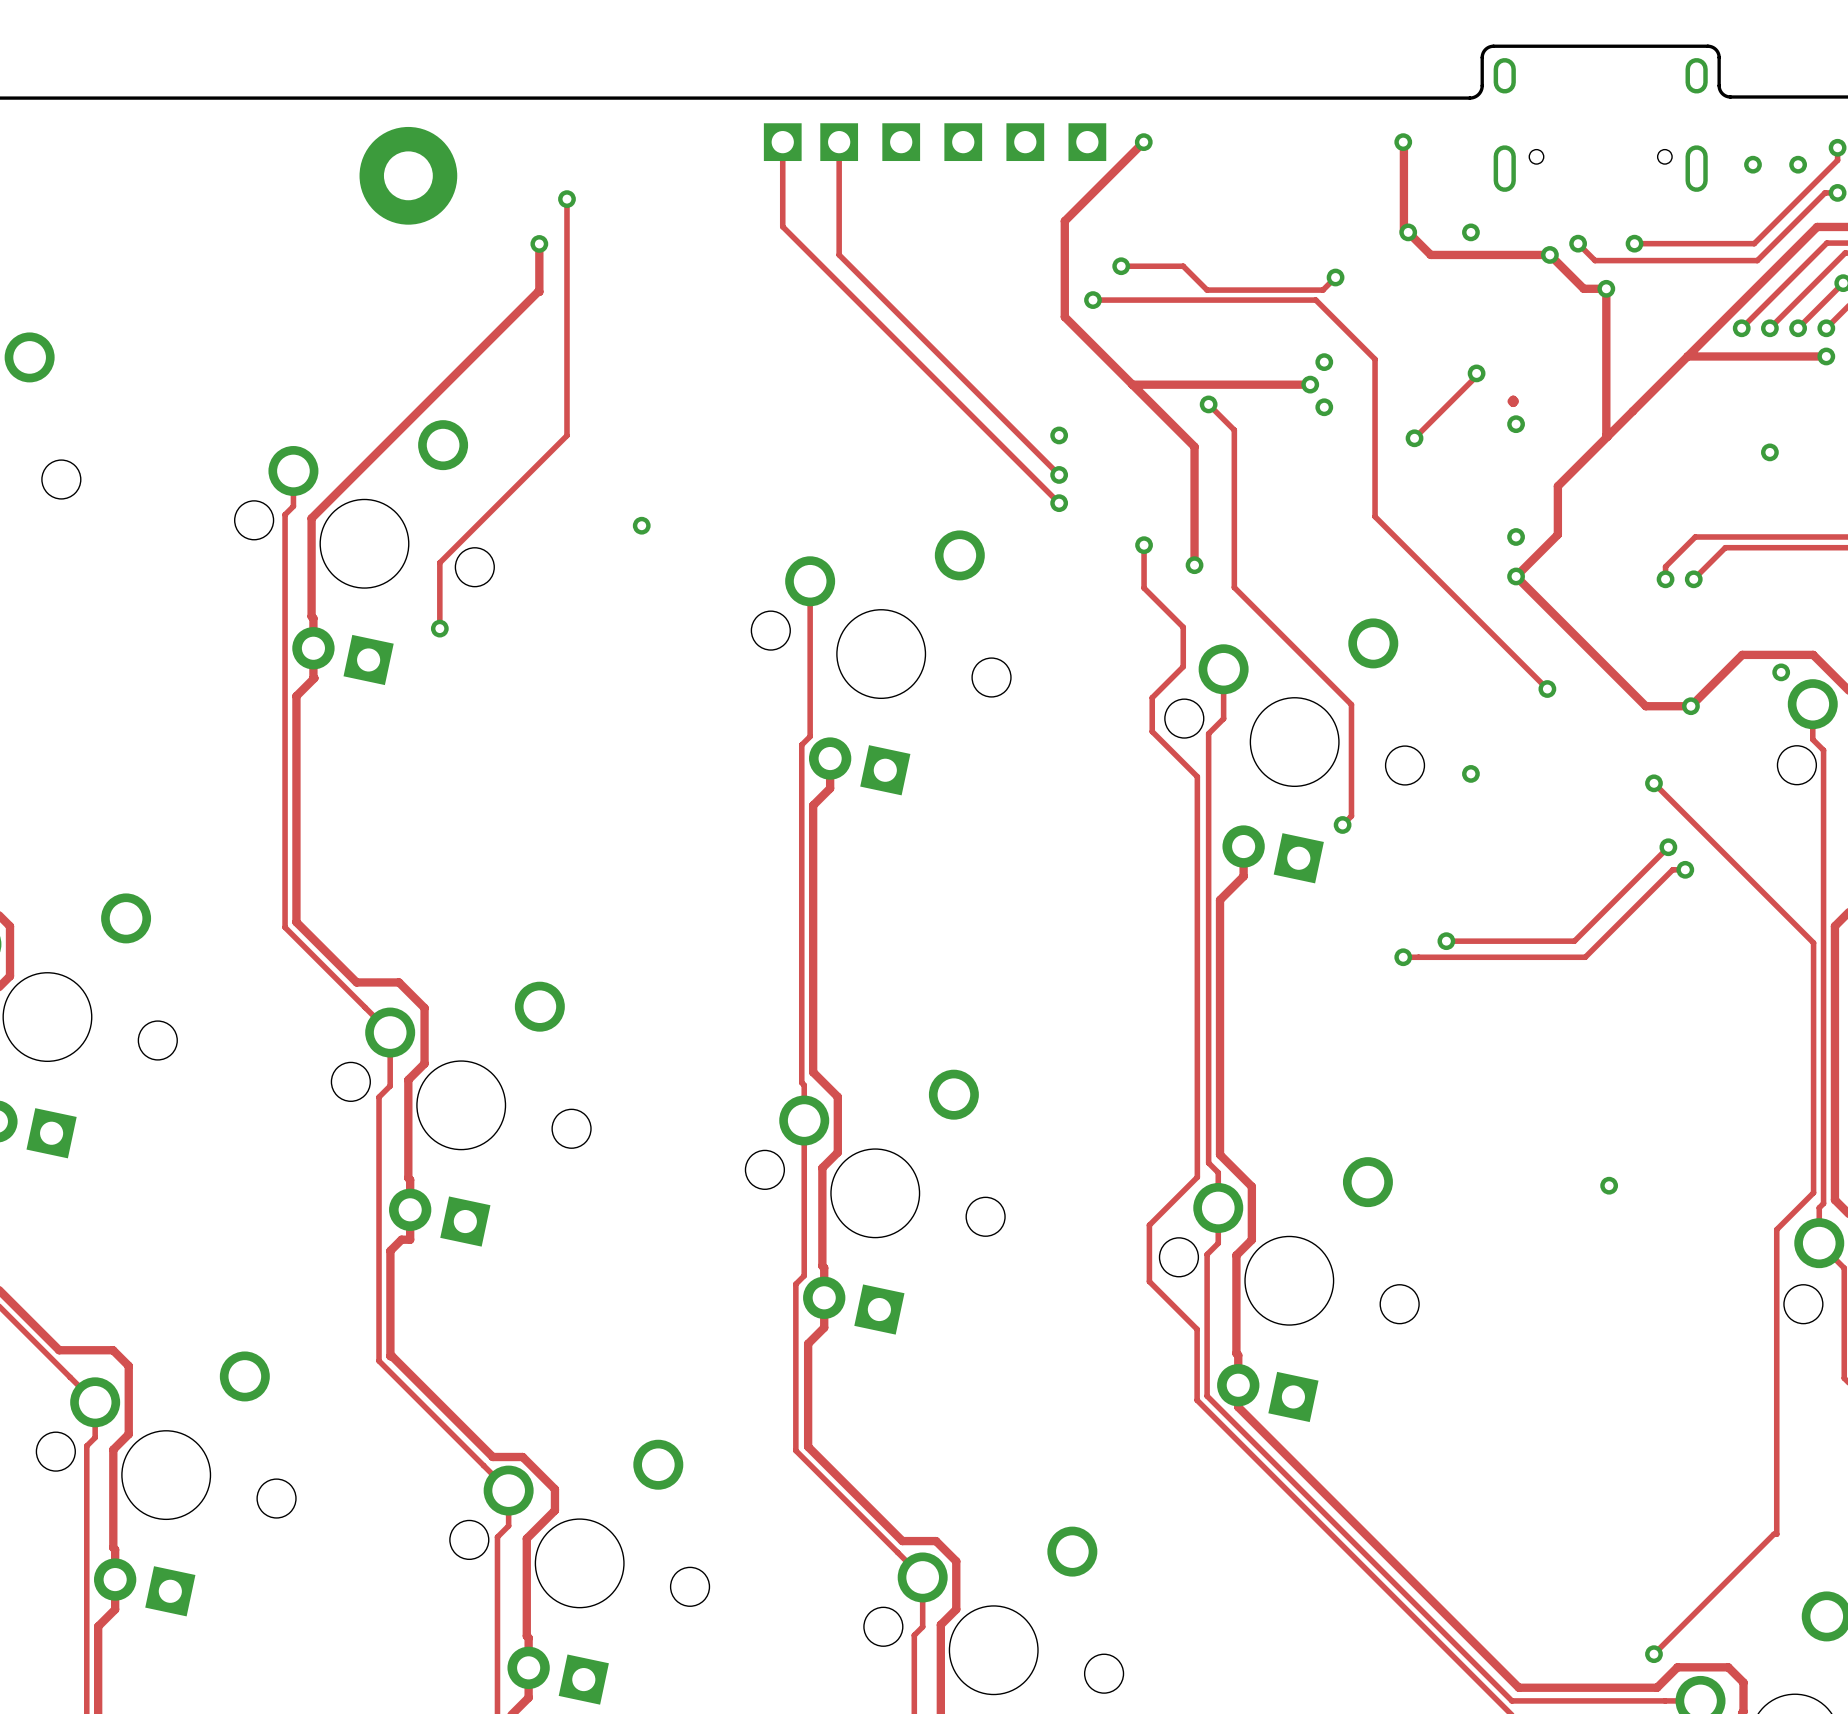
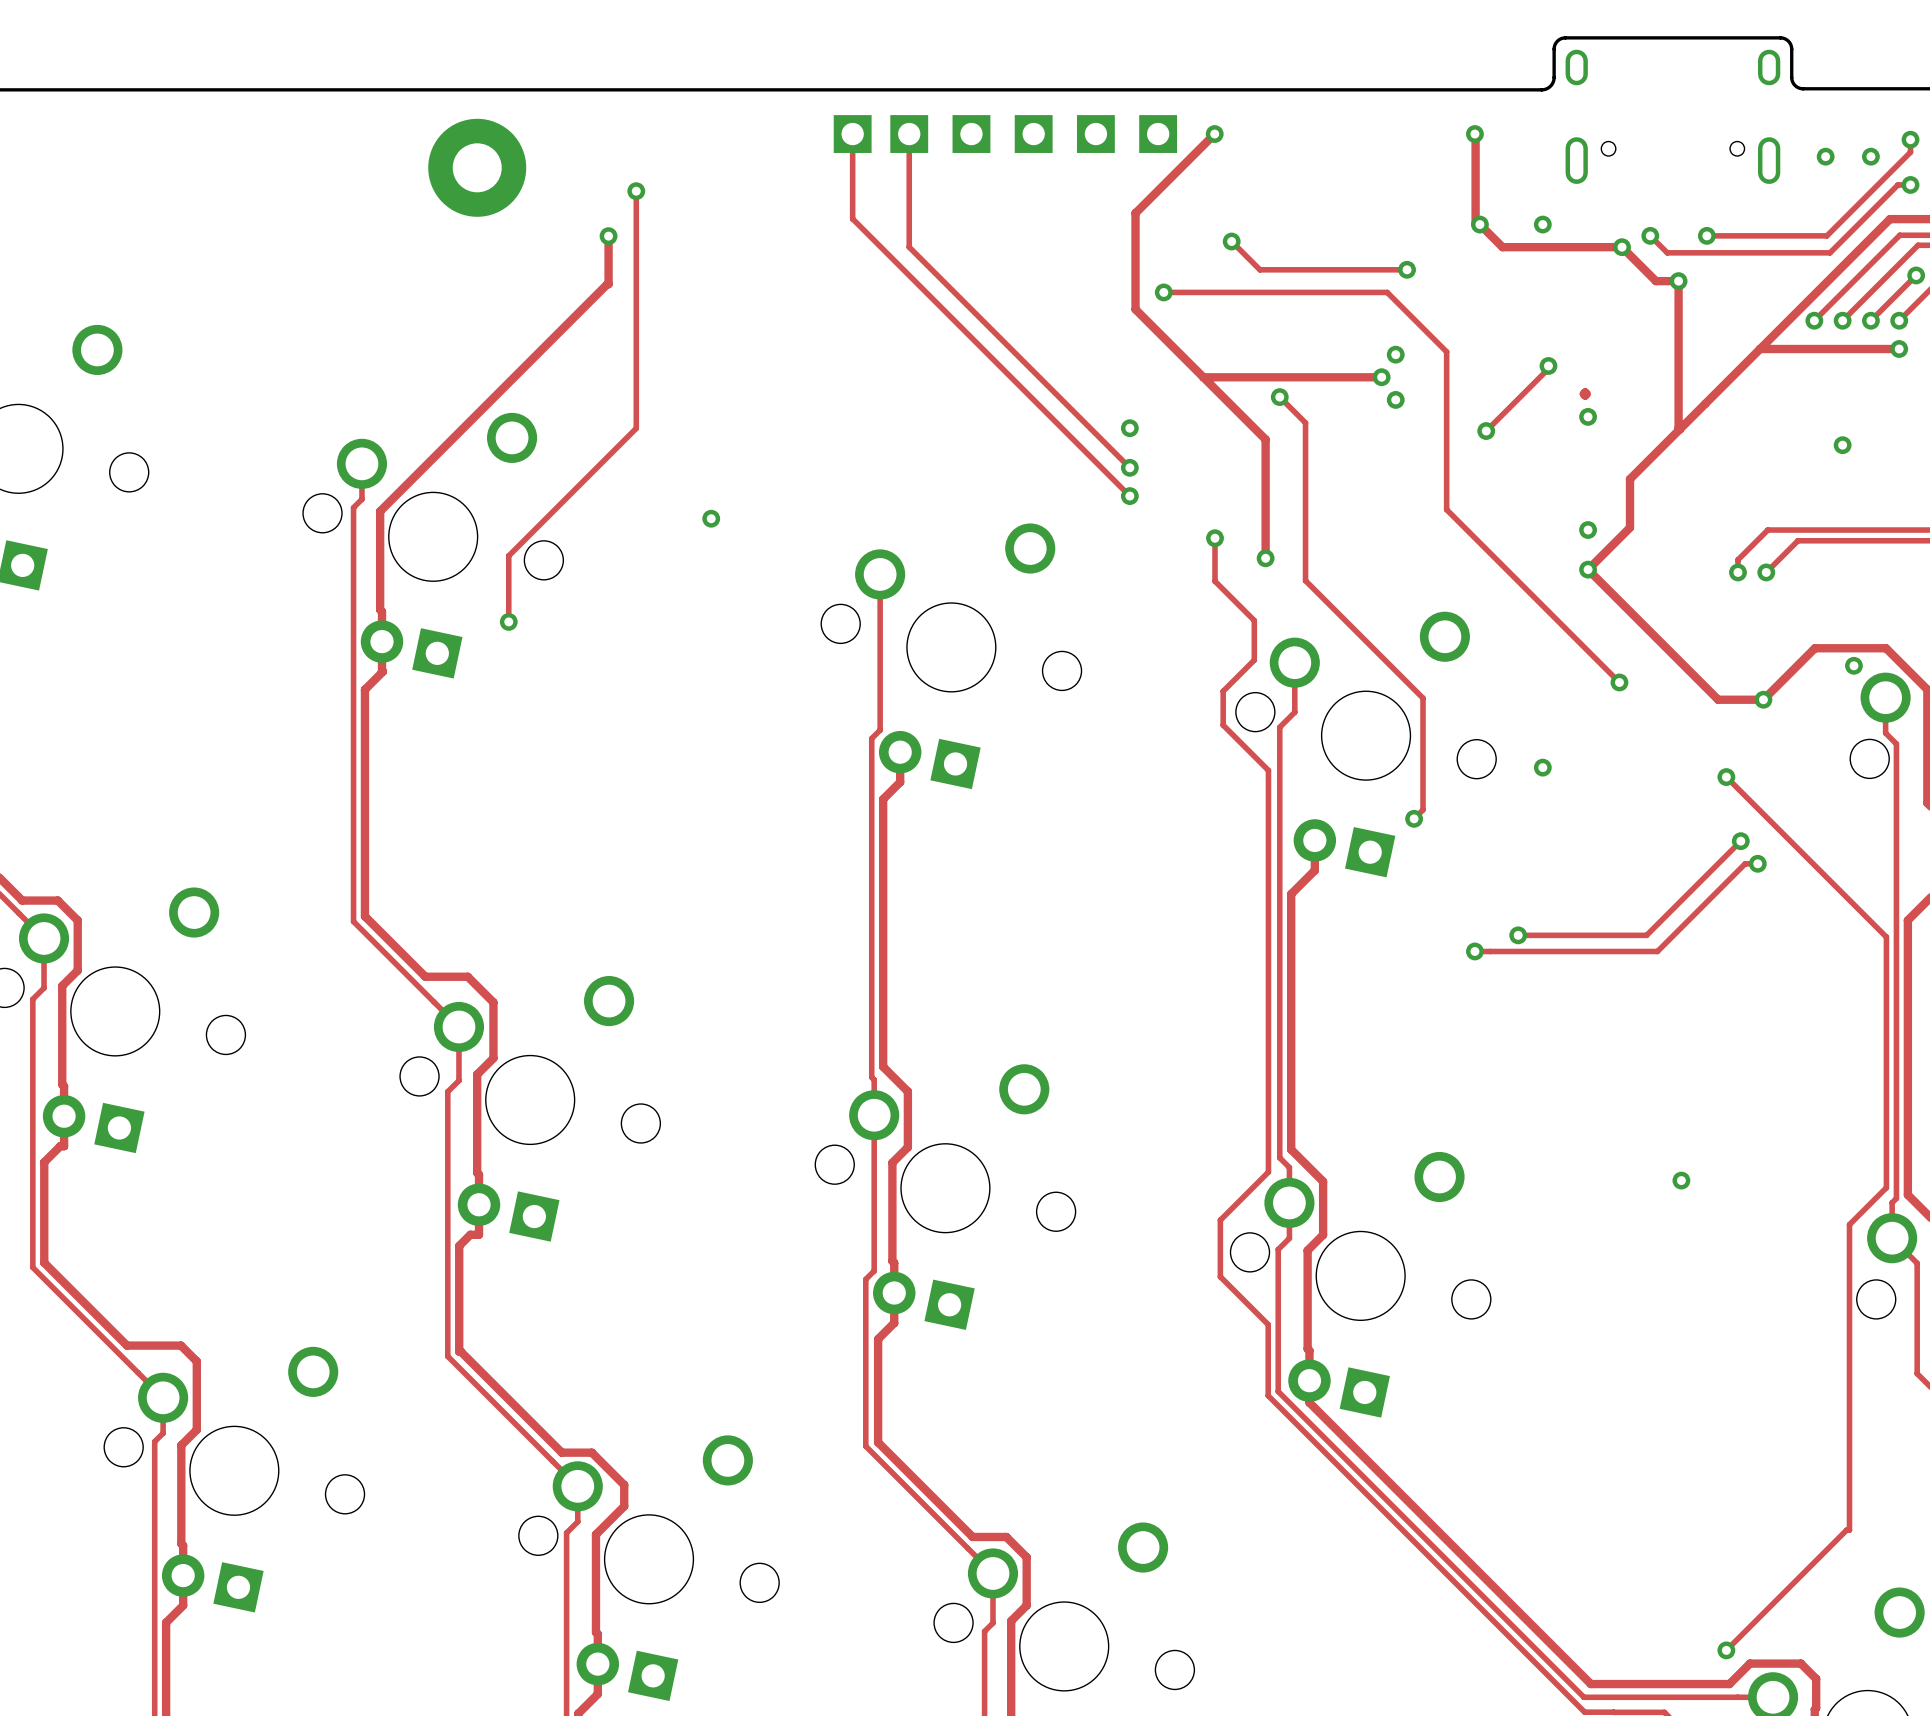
track: (1121, 266) (1183, 266) (1207, 290) (1322, 290) (1335, 277) -> (1231, 241) (1259, 269) (1407, 269)
via position: (1121, 266) -> (1231, 241)

